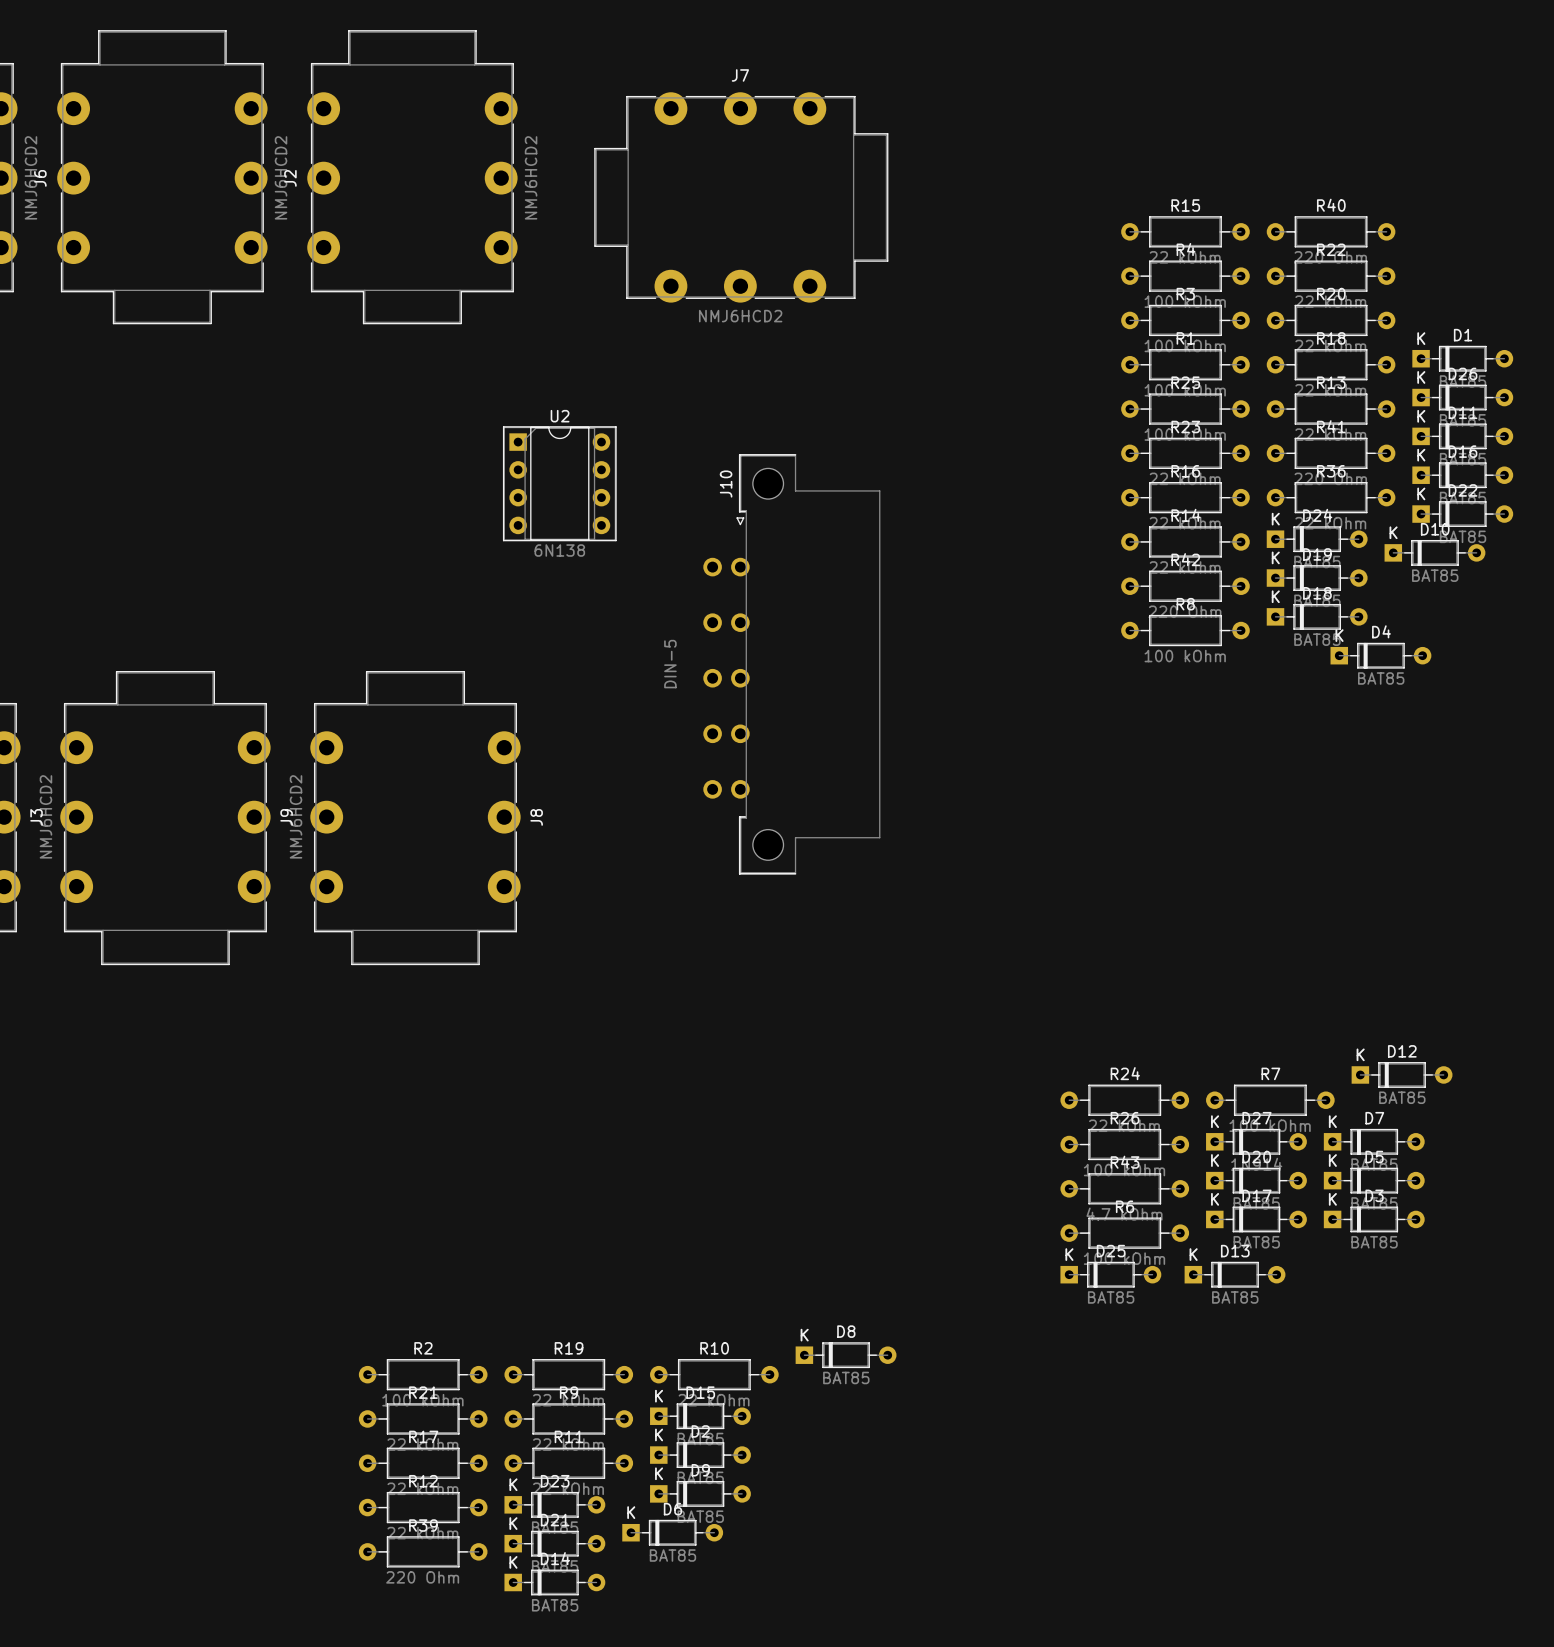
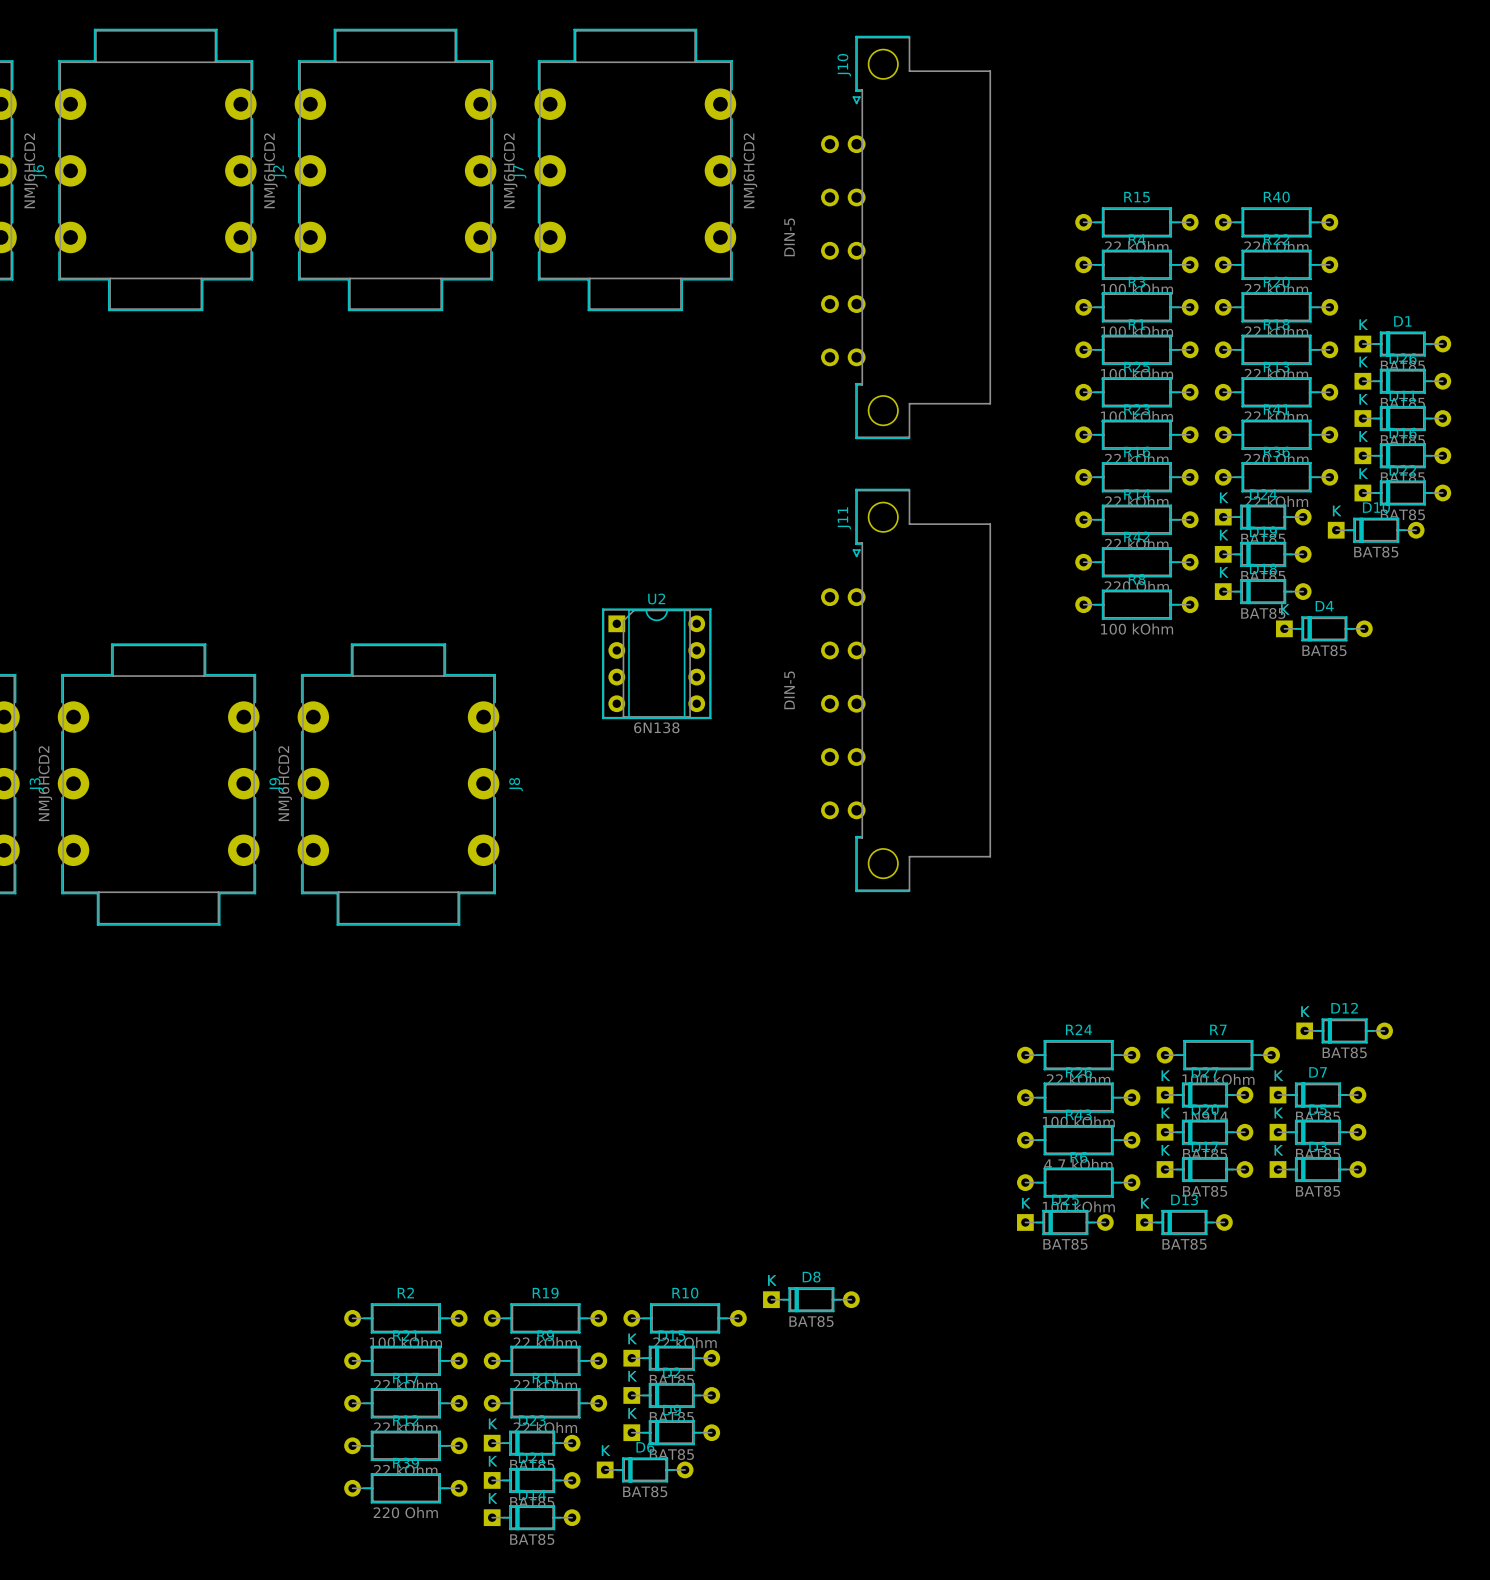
J7 rotation: 0° (741, 197) -> 90° counterclockwise (635, 169)
U2 position: (559, 483) -> (656, 663)
J10 position: (791, 664) -> (905, 237)
J11: none -> DIN-5 (905, 690)

